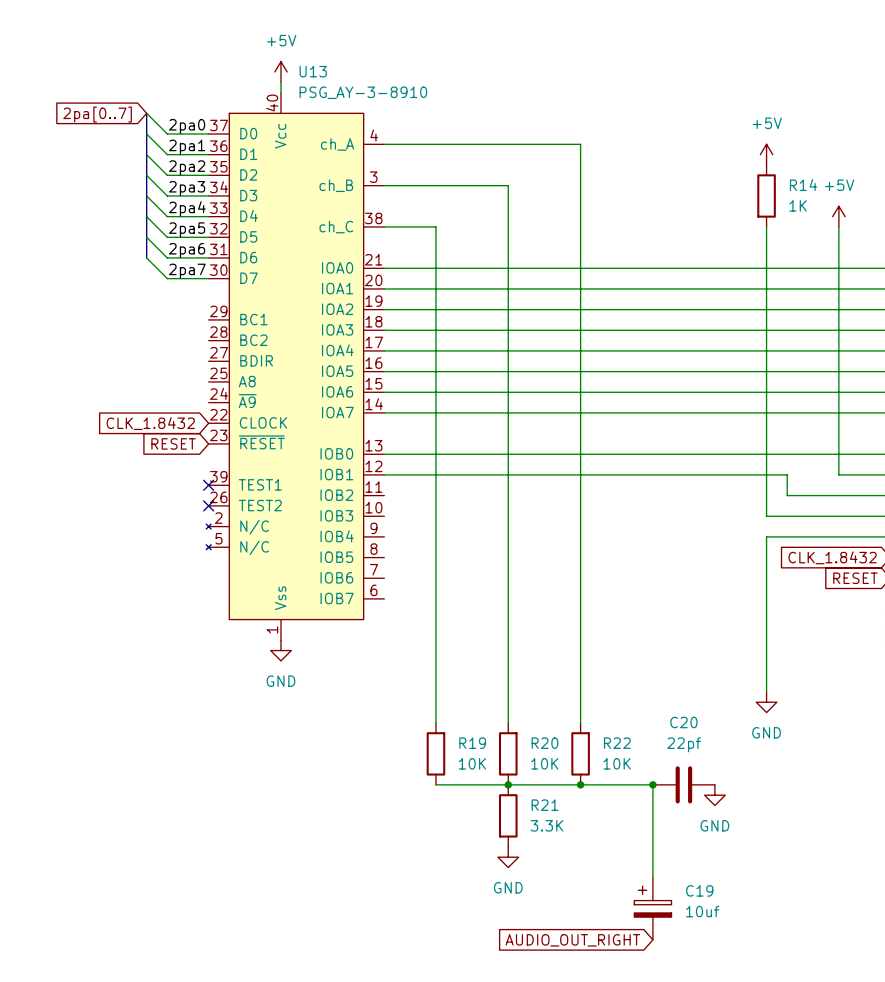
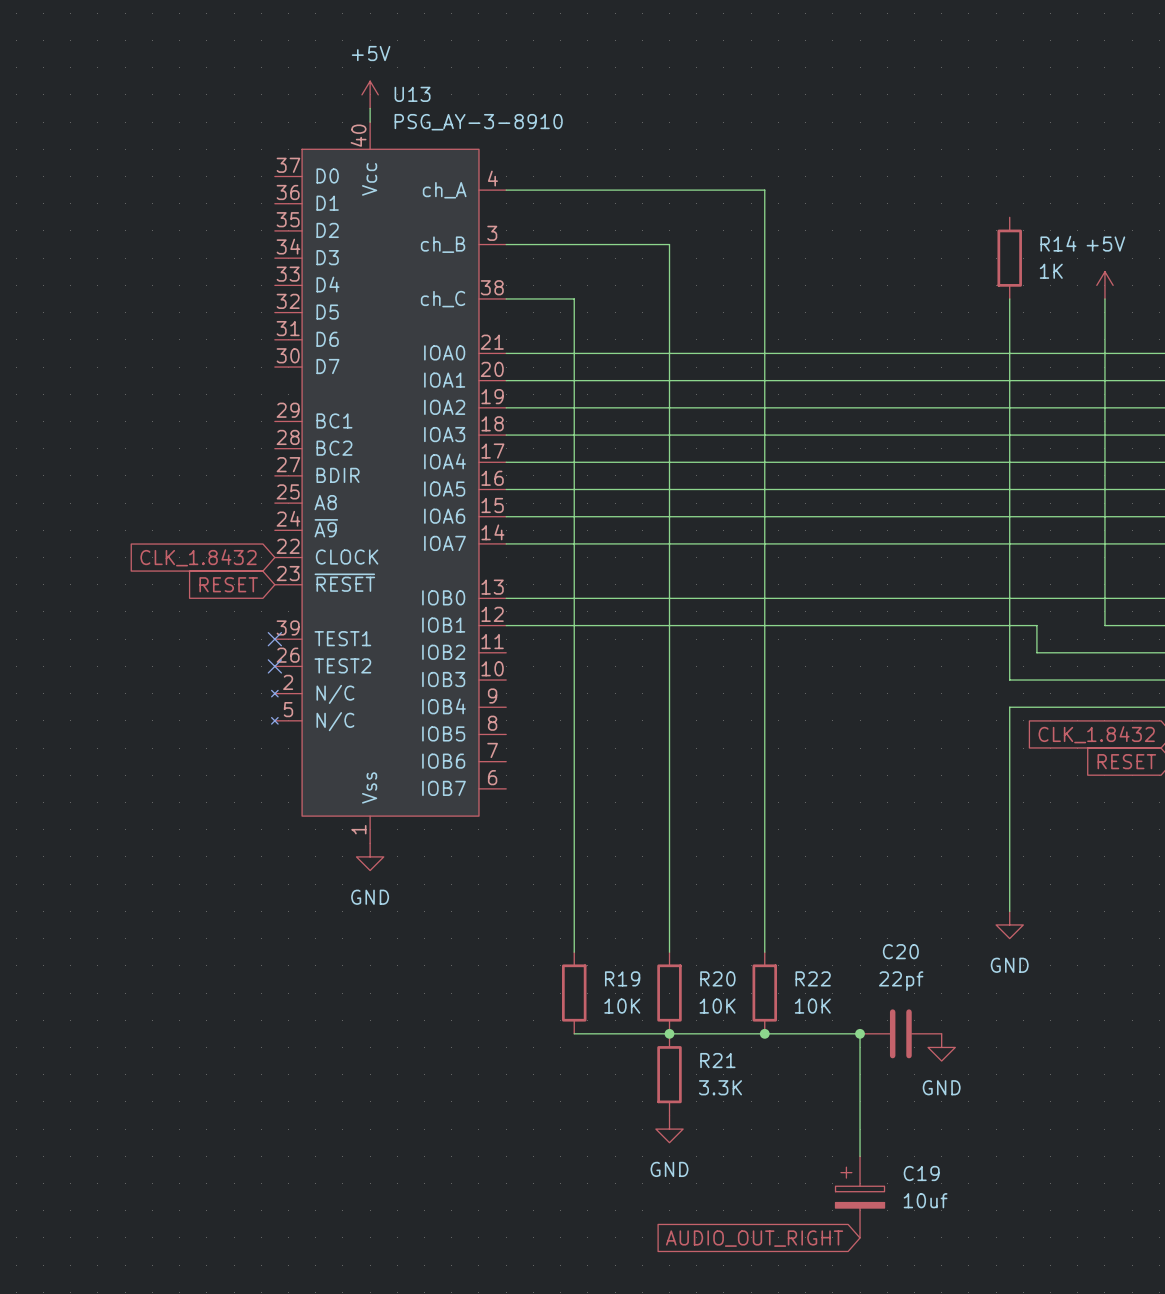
wire: (146, 113) (167, 134) (208, 134) -> none
bus: (146, 113) (146, 257) -> none
global label: 2pa[0..7] (97, 114) -> none
label: 2pa0 (187, 126) -> none
wire: (146, 134) (167, 154) (208, 154) -> none
label: 2pa1 (187, 147) -> none
wire: (146, 154) (167, 175) (208, 175) -> none
power symbol: +5V (766, 154) -> none
label: 2pa2 (187, 167) -> none
wire: (146, 175) (167, 195) (208, 195) -> none
label: 2pa3 (187, 188) -> none
wire: (146, 195) (167, 216) (208, 216) -> none
label: 2pa4 (187, 208) -> none
wire: (146, 216) (167, 237) (208, 237) -> none
label: 2pa5 (187, 229) -> none
wire: (146, 237) (167, 257) (208, 257) -> none
label: 2pa6 (187, 250) -> none
wire: (146, 257) (167, 278) (208, 278) -> none
label: 2pa7 (187, 271) -> none

